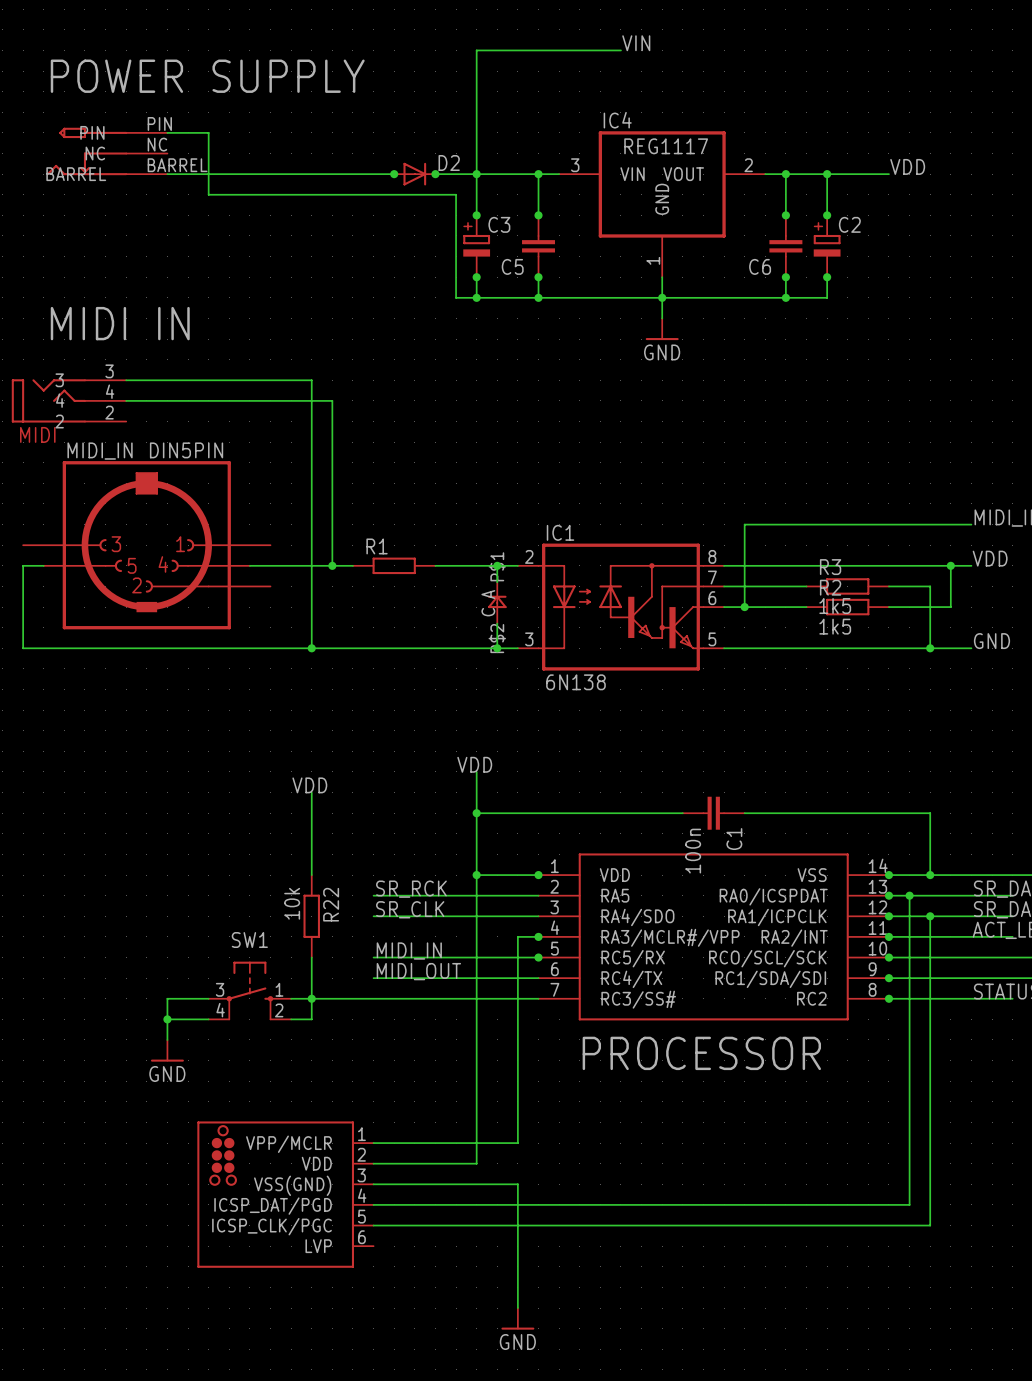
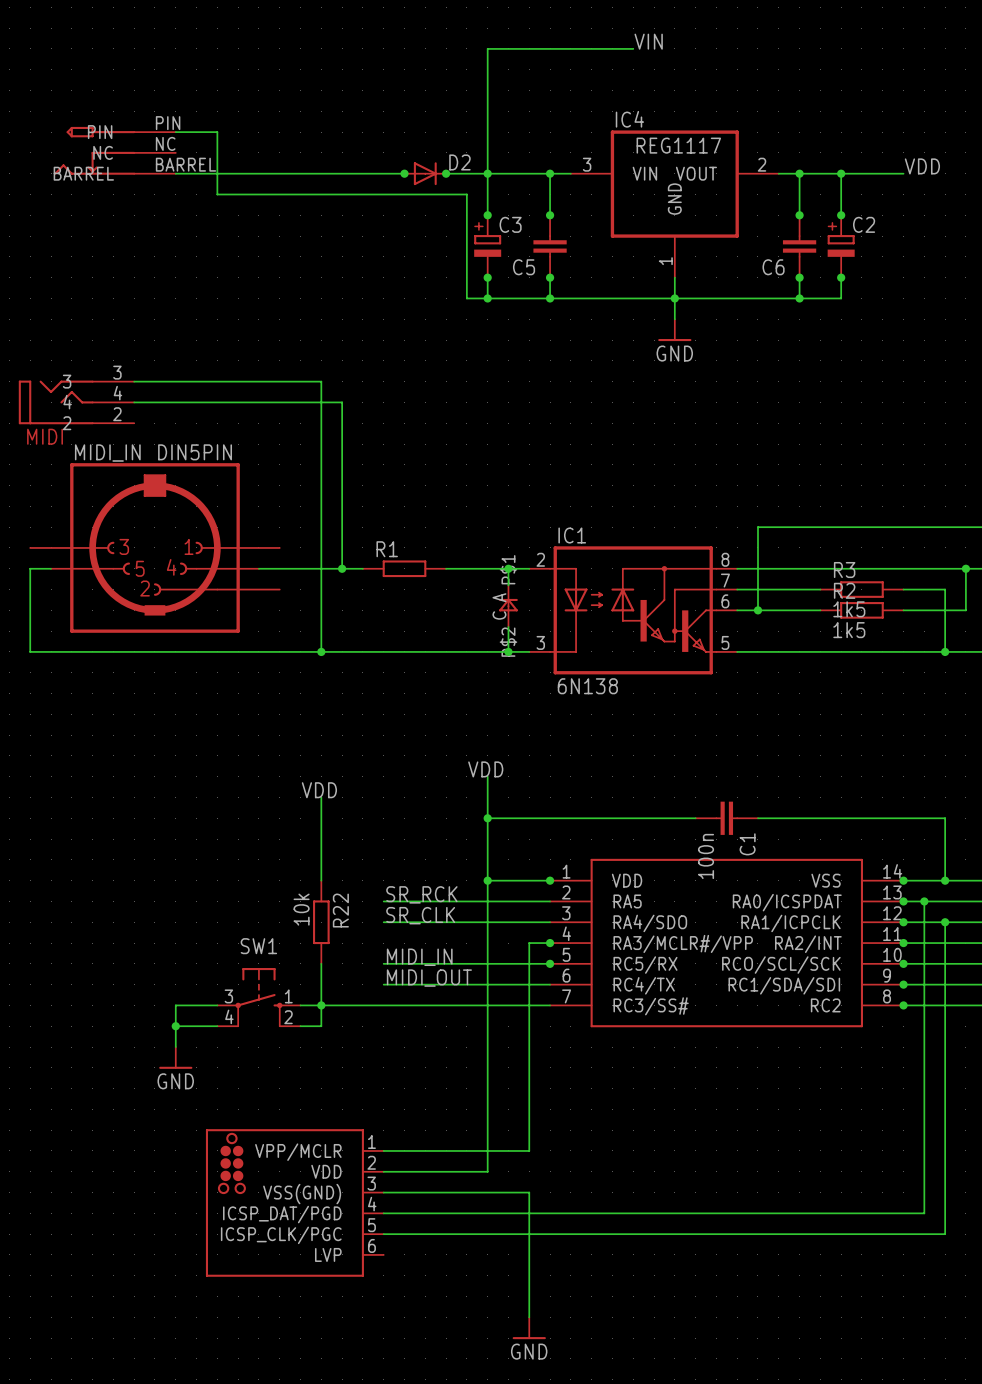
text: POWER SUPPLY (207, 76) -> none
text: MIDI IN (120, 323) -> none
text: PROCESSOR (701, 1053) -> none

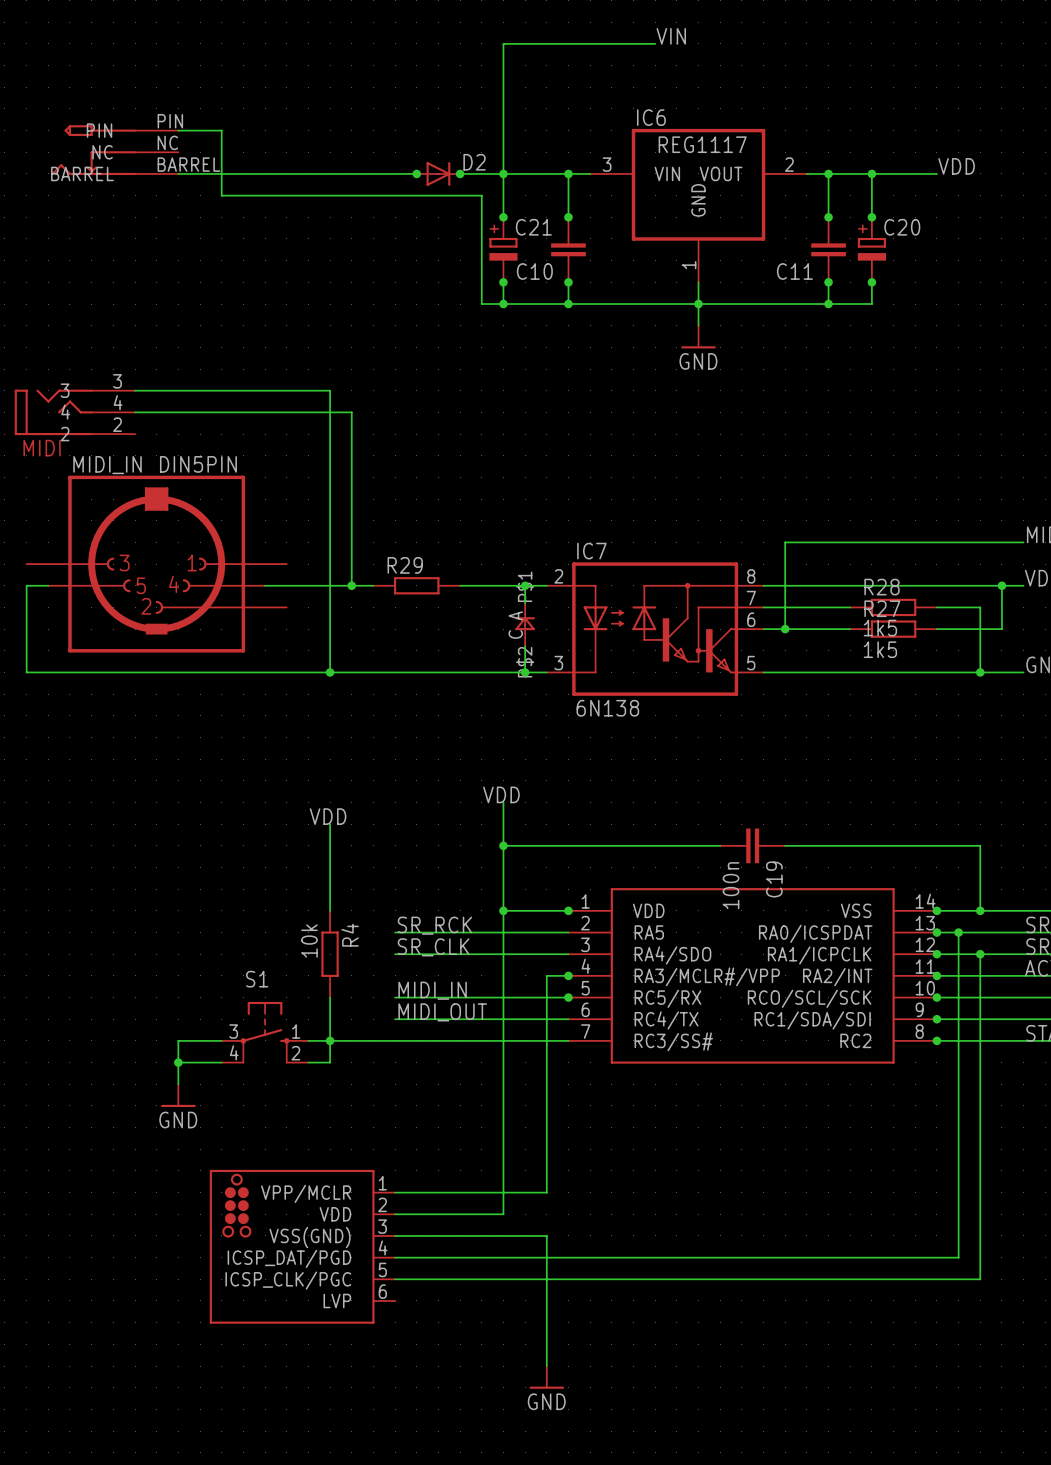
IC4 name: IC4 (629, 119) -> IC6 (651, 117)
C3 name: C3 (510, 224) -> C21 (533, 227)
C2 name: C2 (864, 224) -> C20 (902, 227)
C5 name: C5 (524, 267) -> C10 (534, 271)
C6 name: C6 (773, 267) -> C11 (794, 271)
IC1 name: IC1 (572, 535) -> IC7 (591, 551)
R1 name: R1 (387, 549) -> R29 (405, 565)
R3 name: R3 (844, 570) -> R28 (882, 587)
R2 name: R2 (844, 590) -> R27 (882, 608)
C1 name: C1 (747, 844) -> C19 (774, 879)
R22 name: R22 (340, 910) -> R4 (350, 935)
SW1 name: SW1 (258, 946) -> S1 (257, 979)

